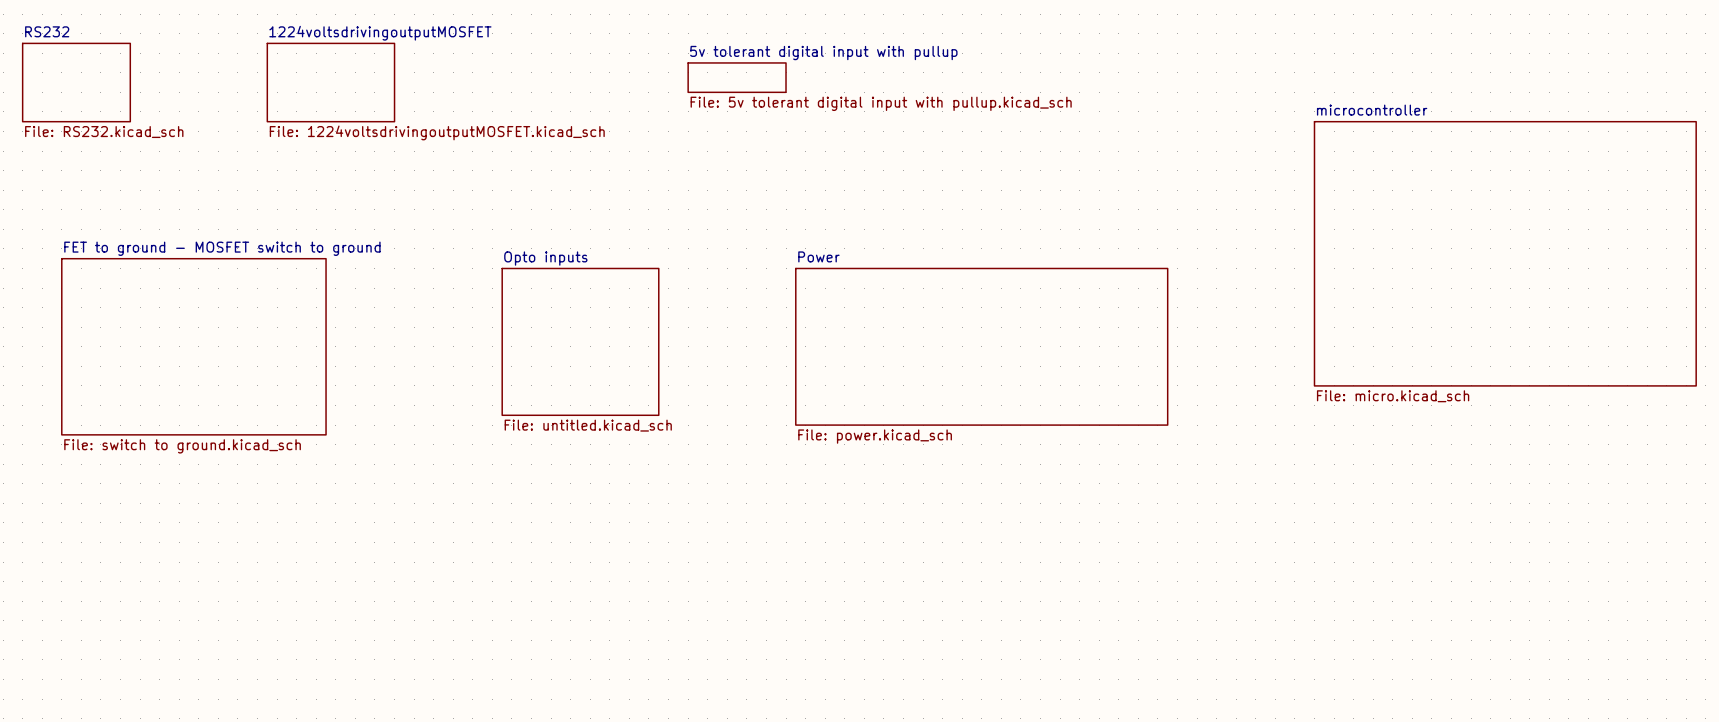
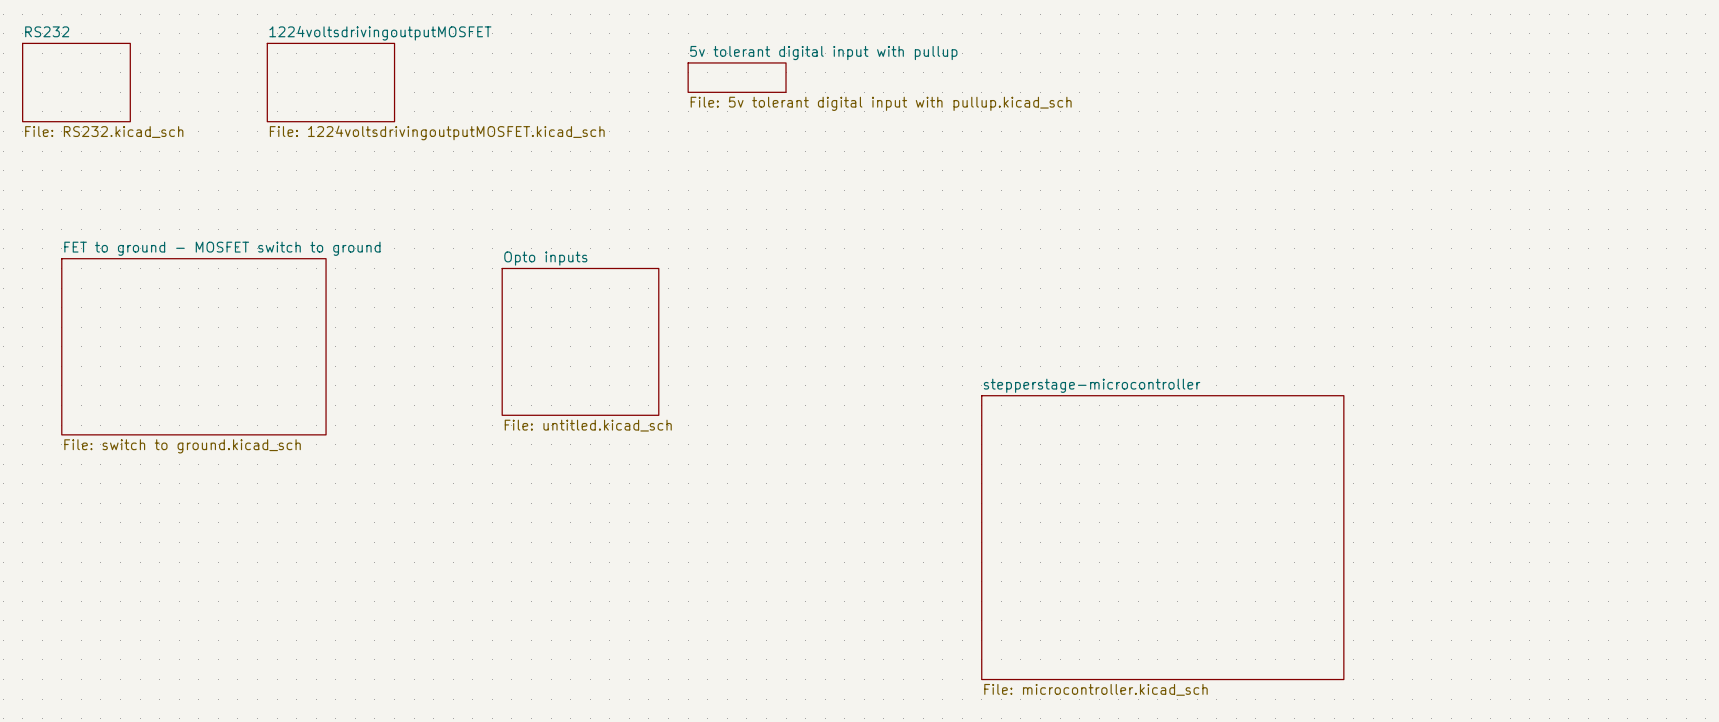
sheet microcontroller: File: micro.kicad_sch (1505, 253) -> none
sheet Power: File: power.kicad_sch (981, 346) -> none
sheet stepperstage-microcontroller: none -> File: microcontroller.kicad_sch (1162, 537)

